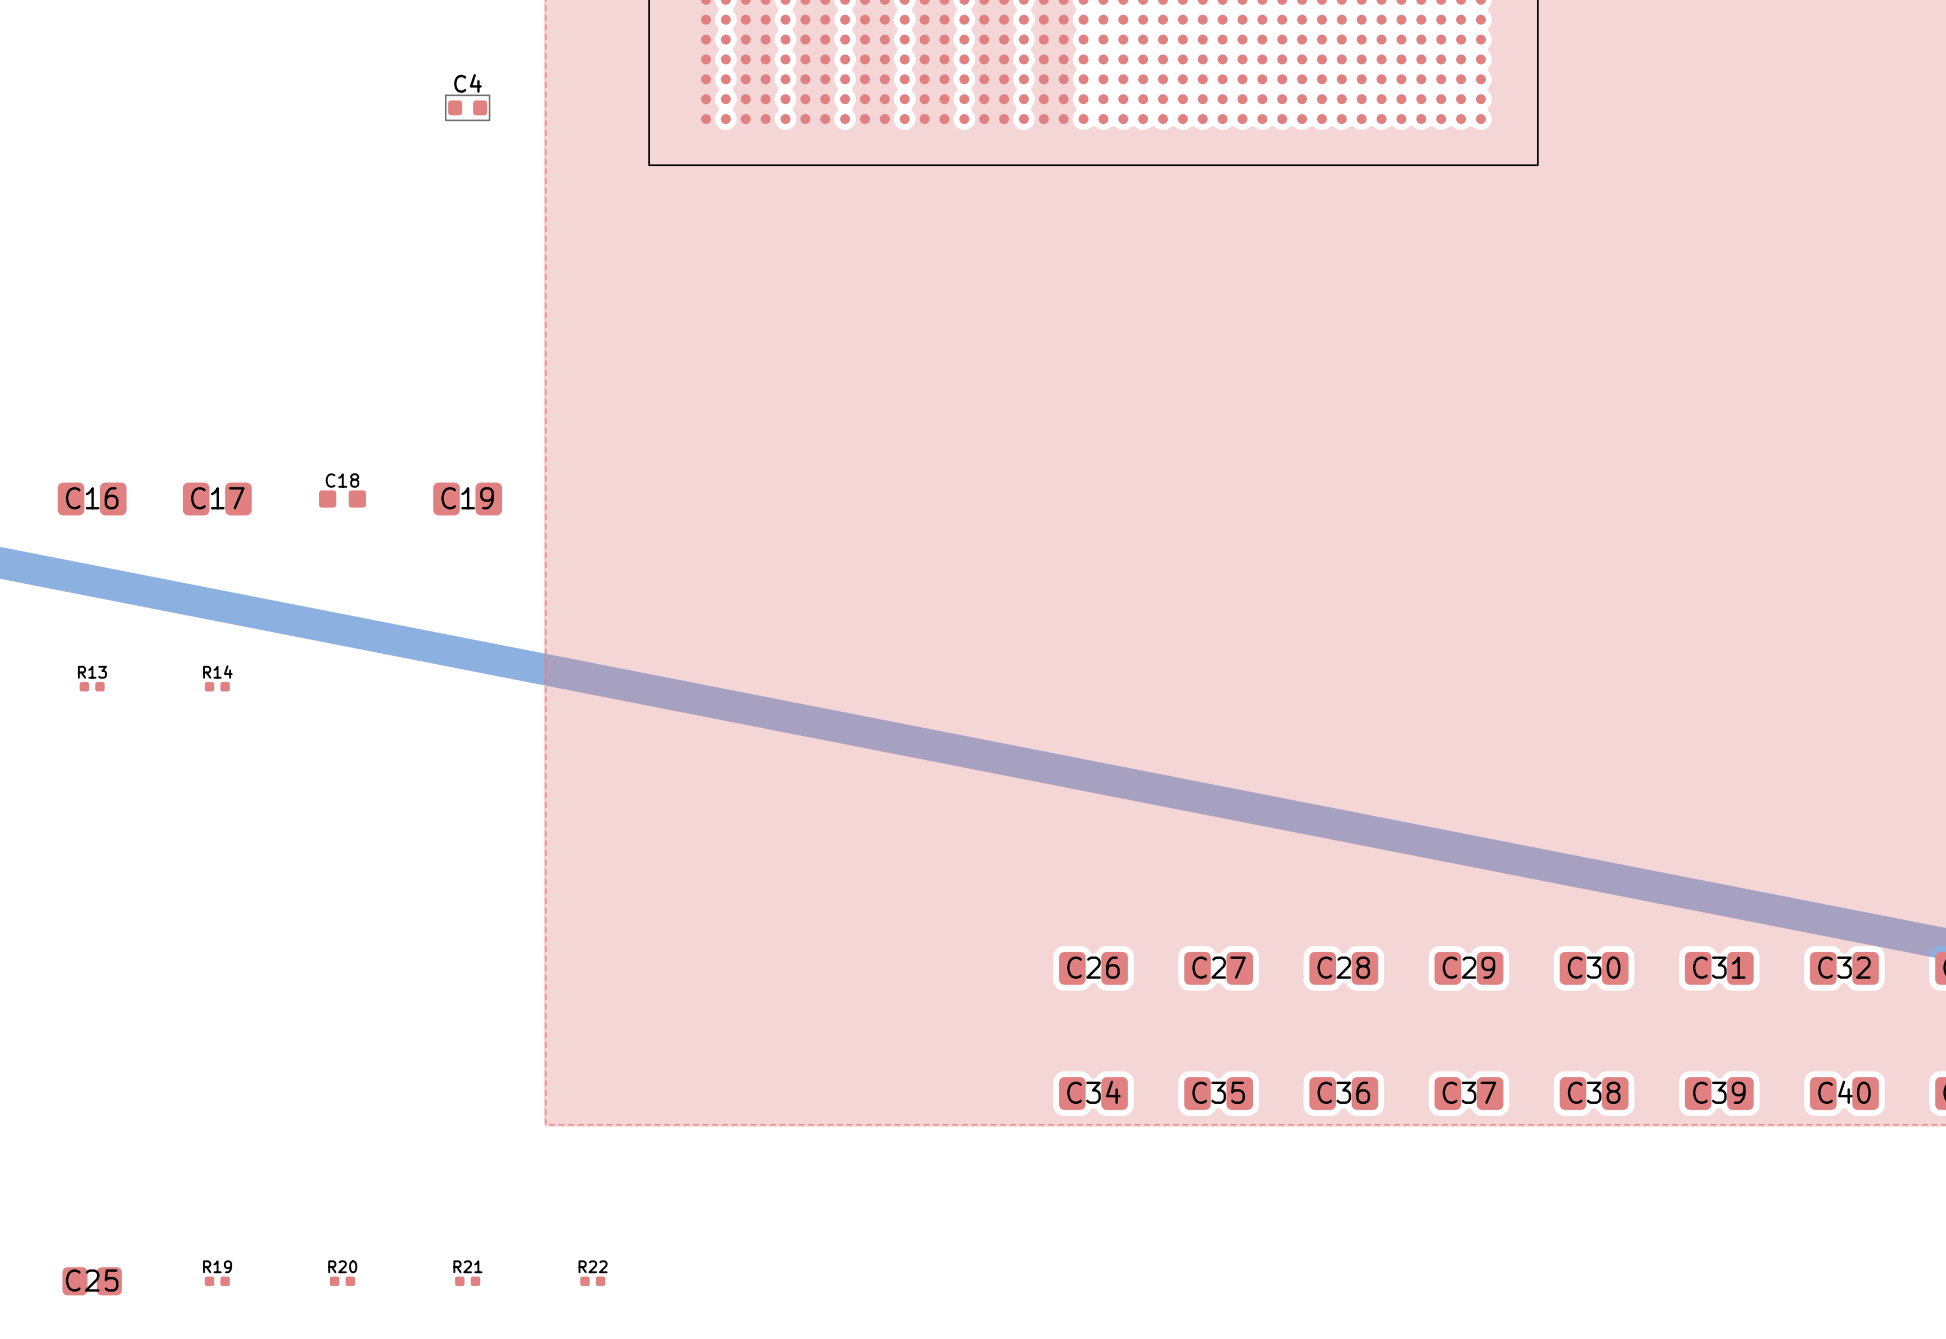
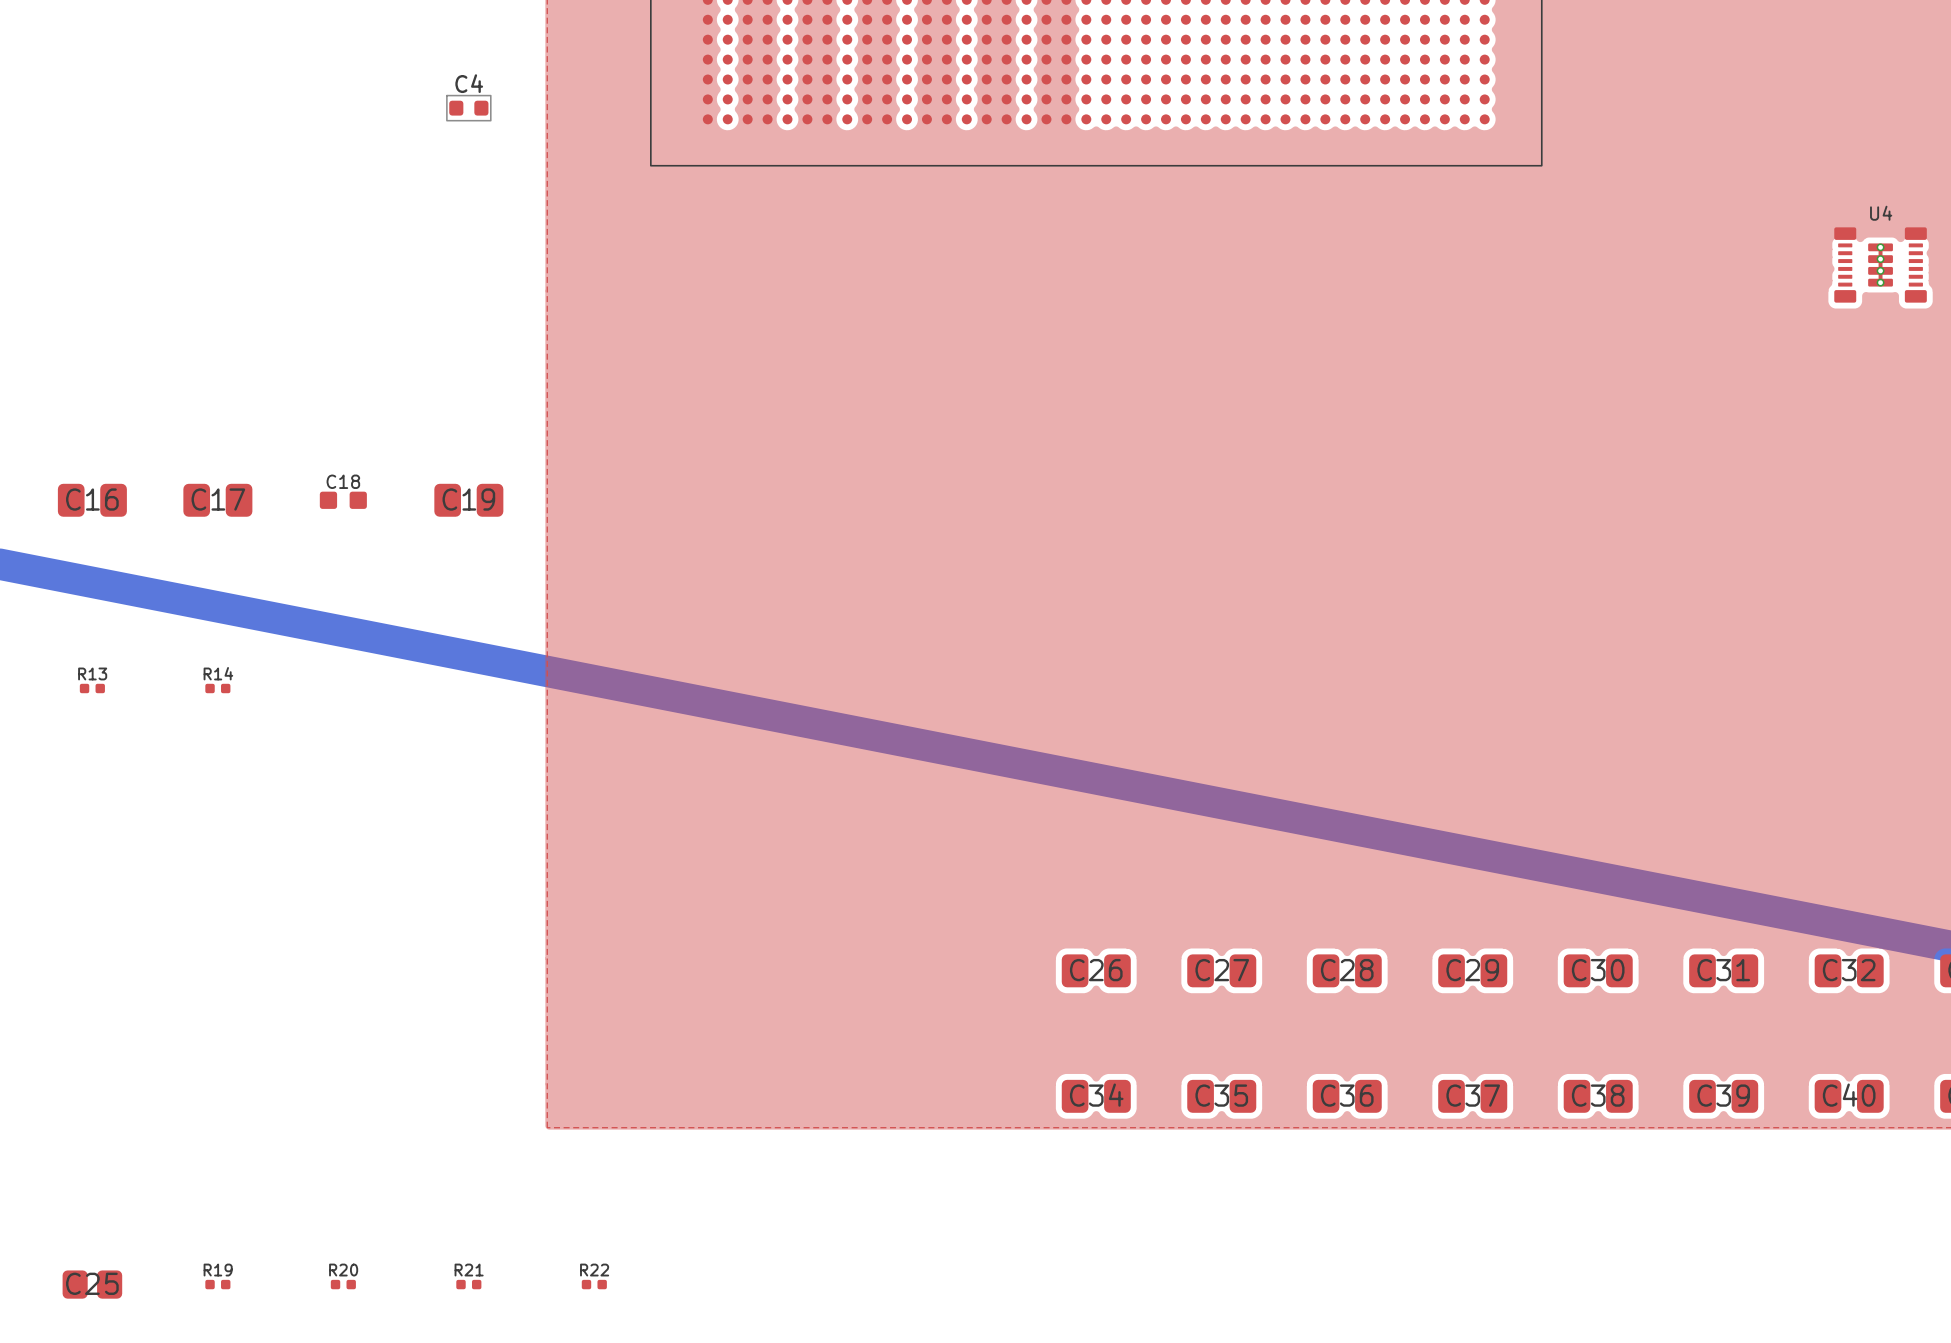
via: none -> (1880, 247)
top track: none -> (1880, 251) (1880, 255)
via: none -> (1880, 259)
top track: none -> (1880, 263) (1880, 266)
U4: none -> (1880, 264)
via: none -> (1880, 270)
top track: none -> (1880, 274) (1880, 278)
via: none -> (1880, 282)

